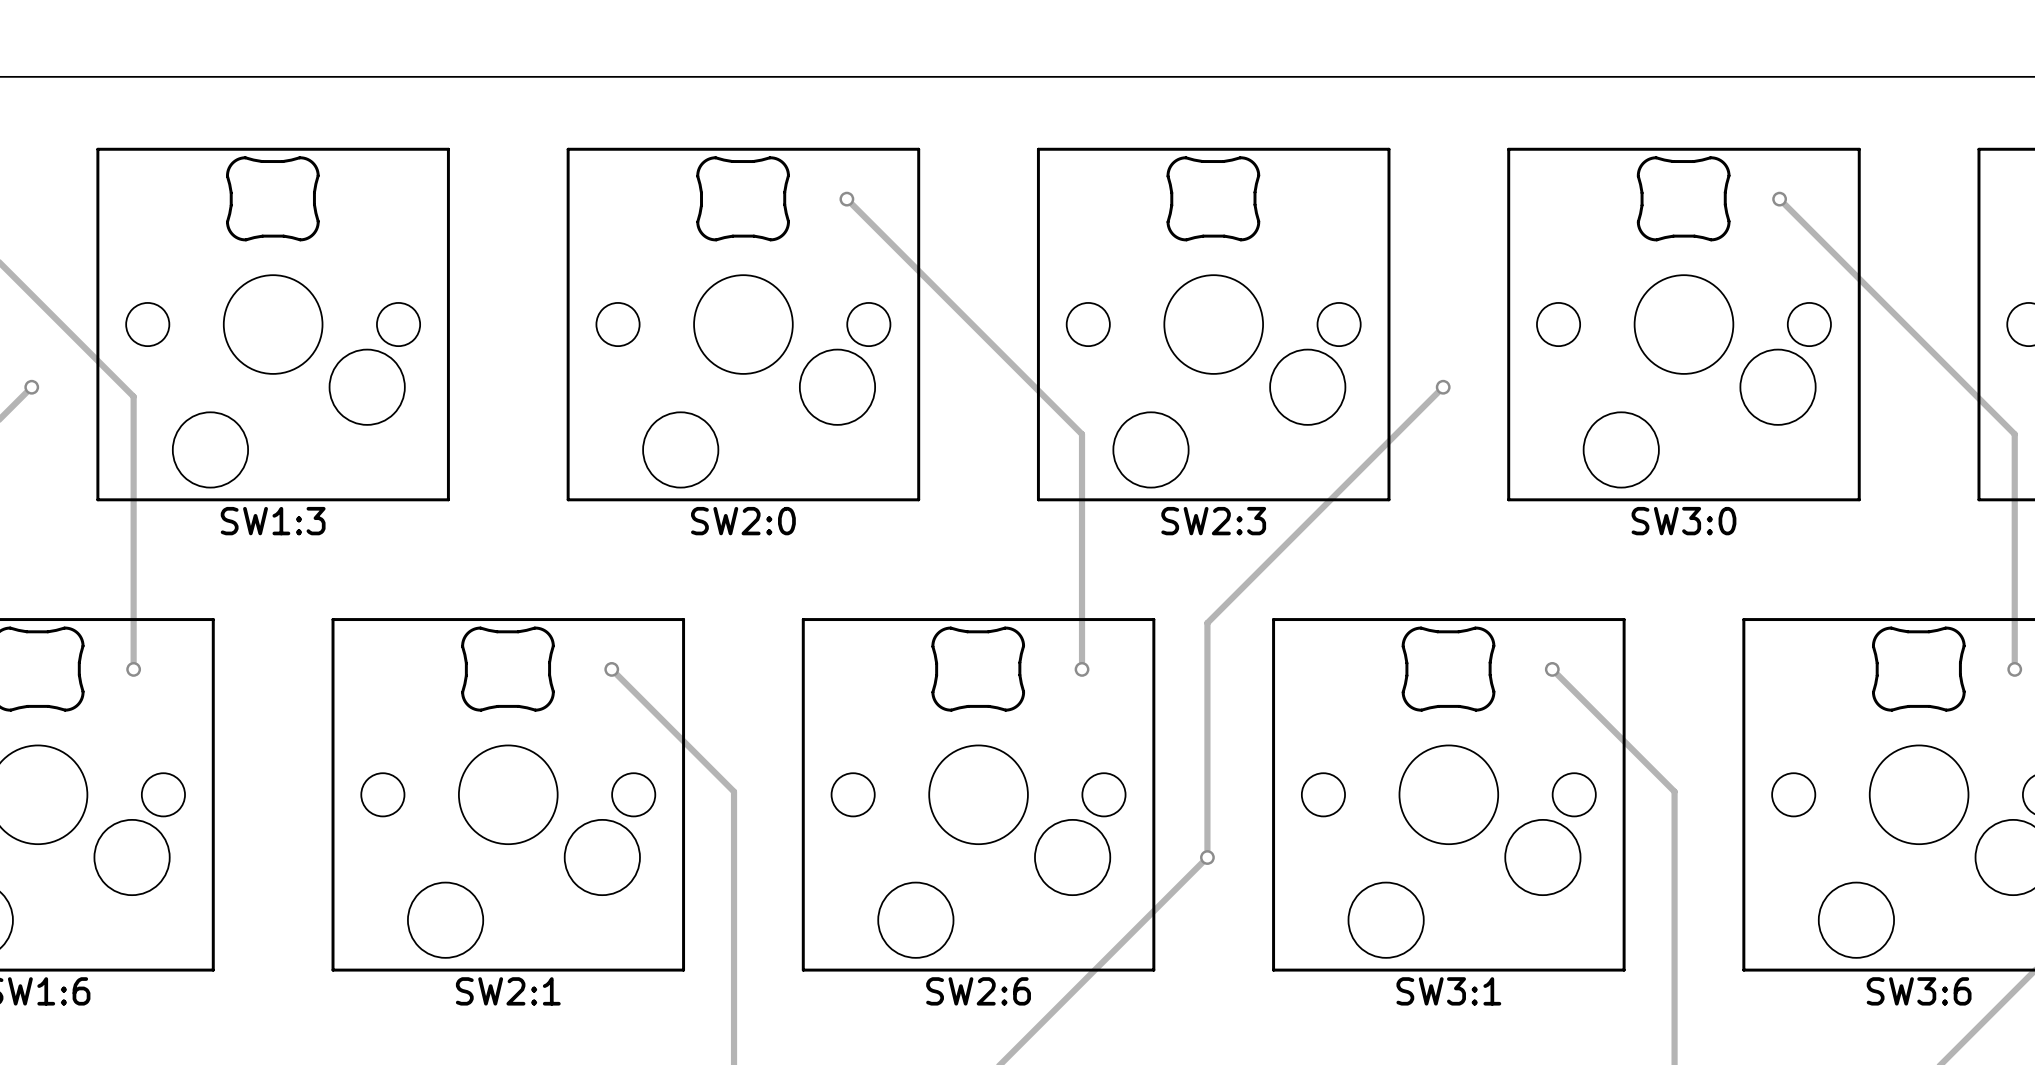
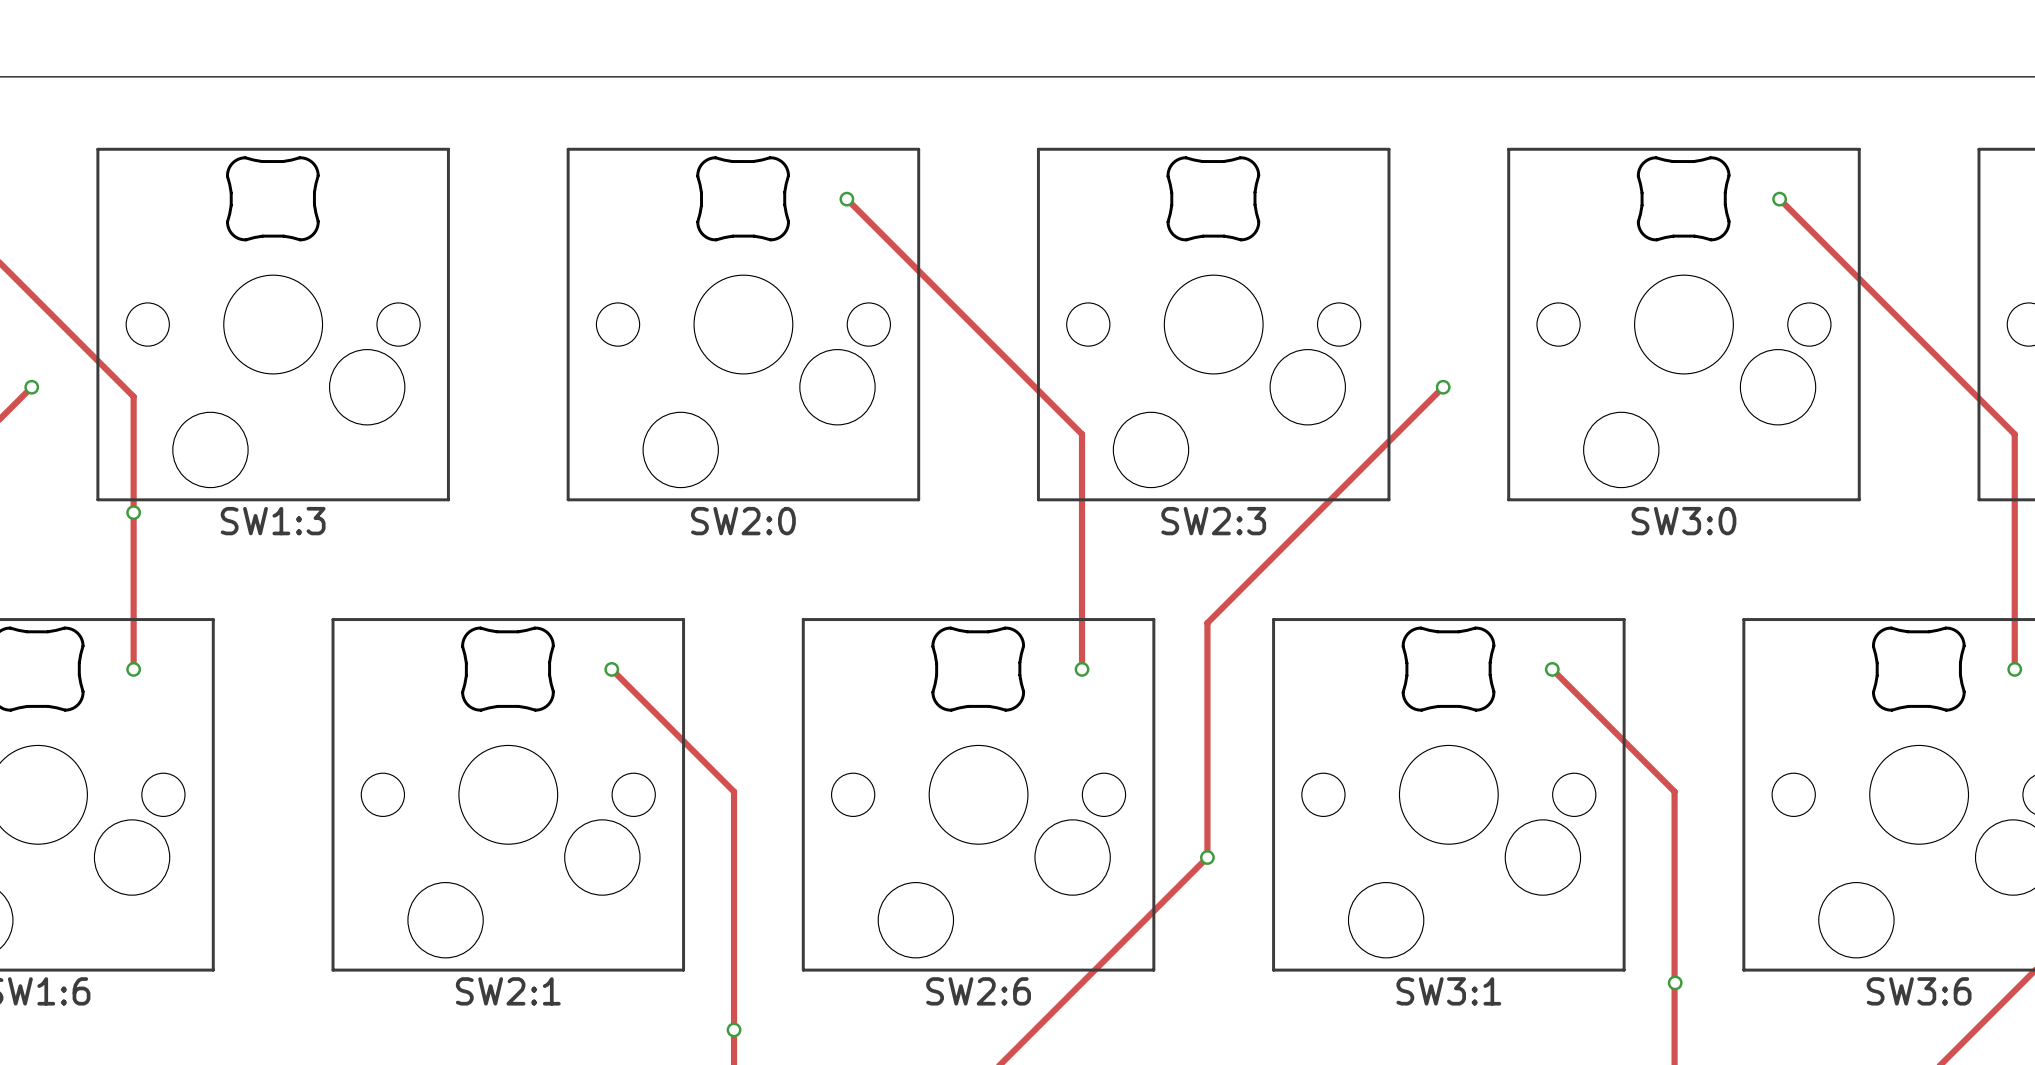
via: none -> (133, 512)
via: none -> (1675, 982)
via: none -> (734, 1029)

